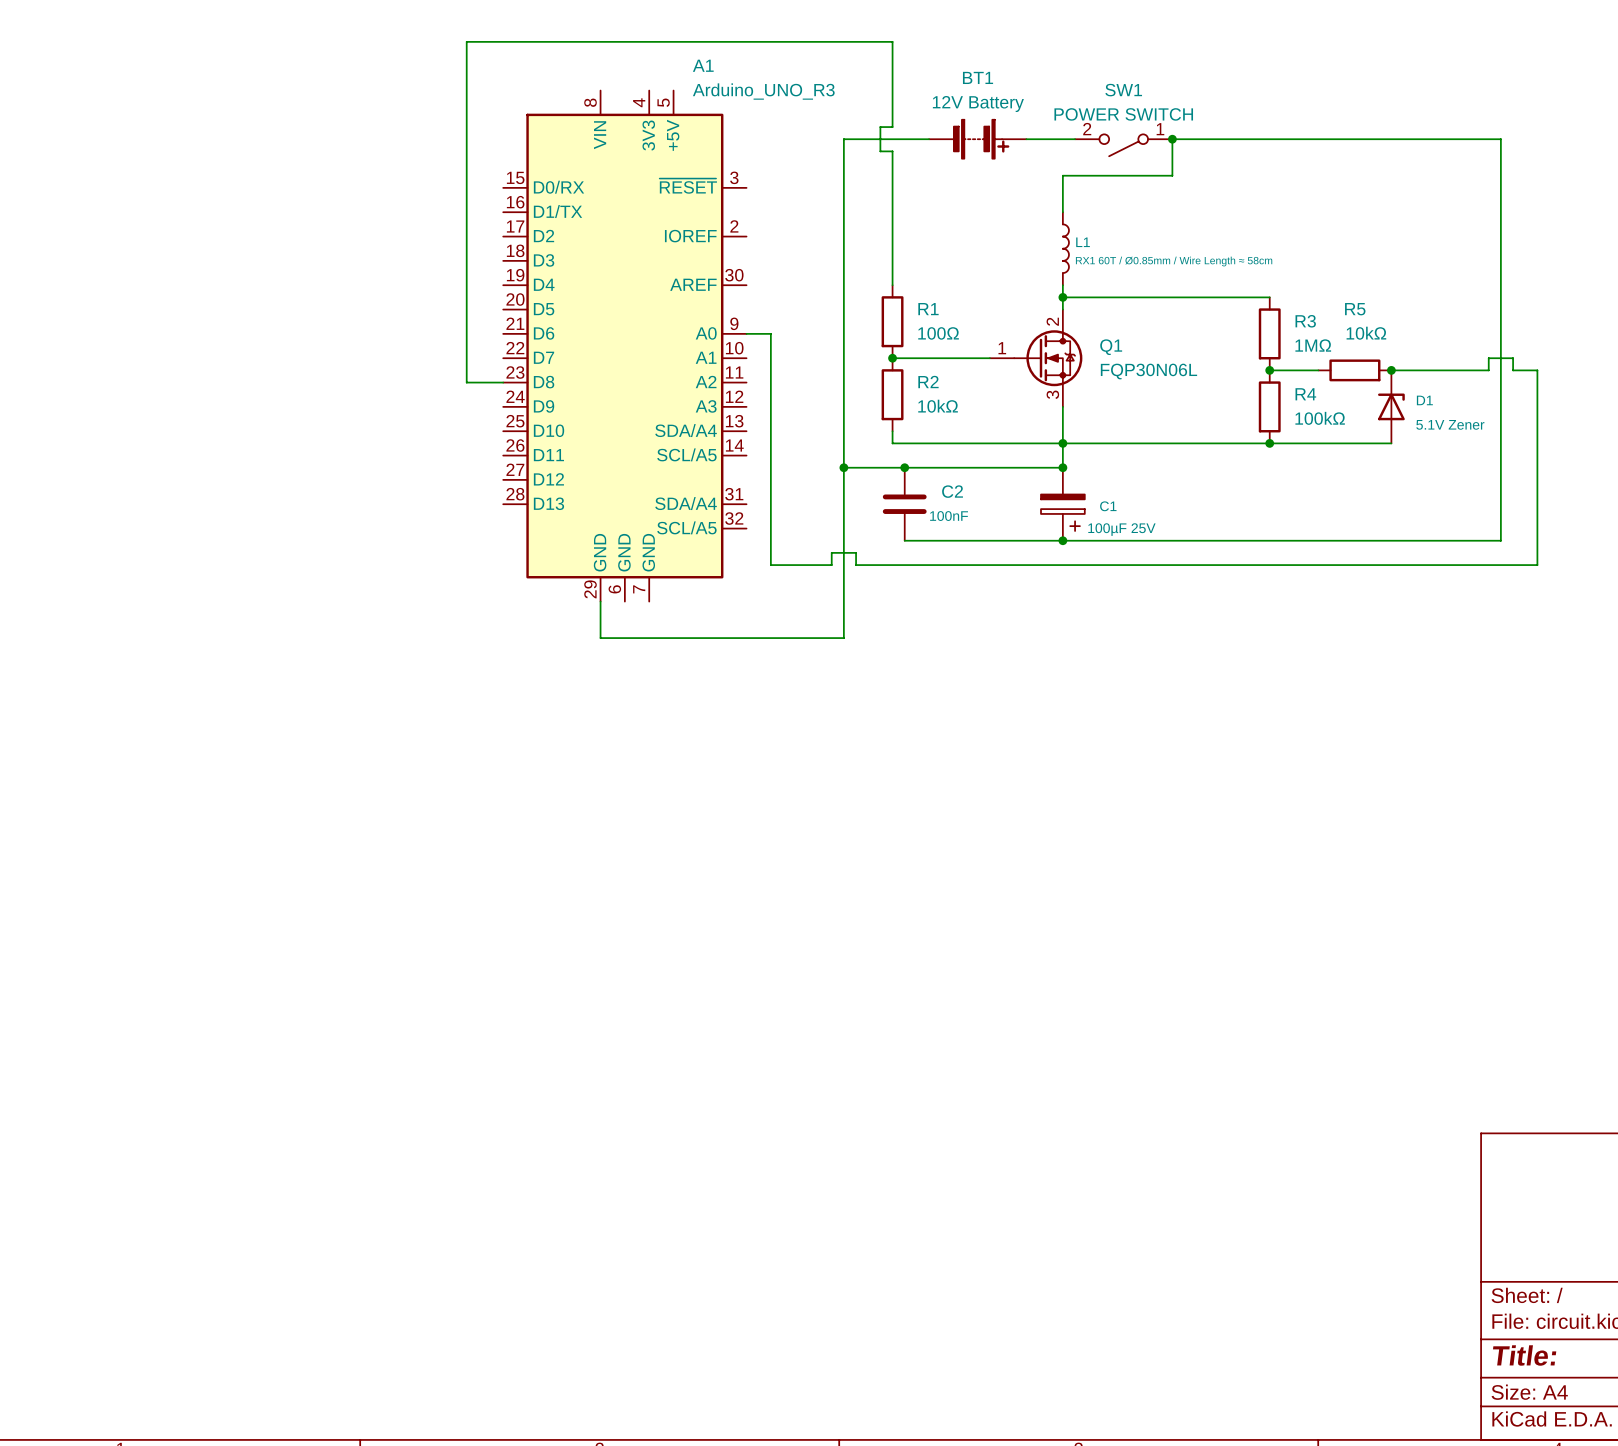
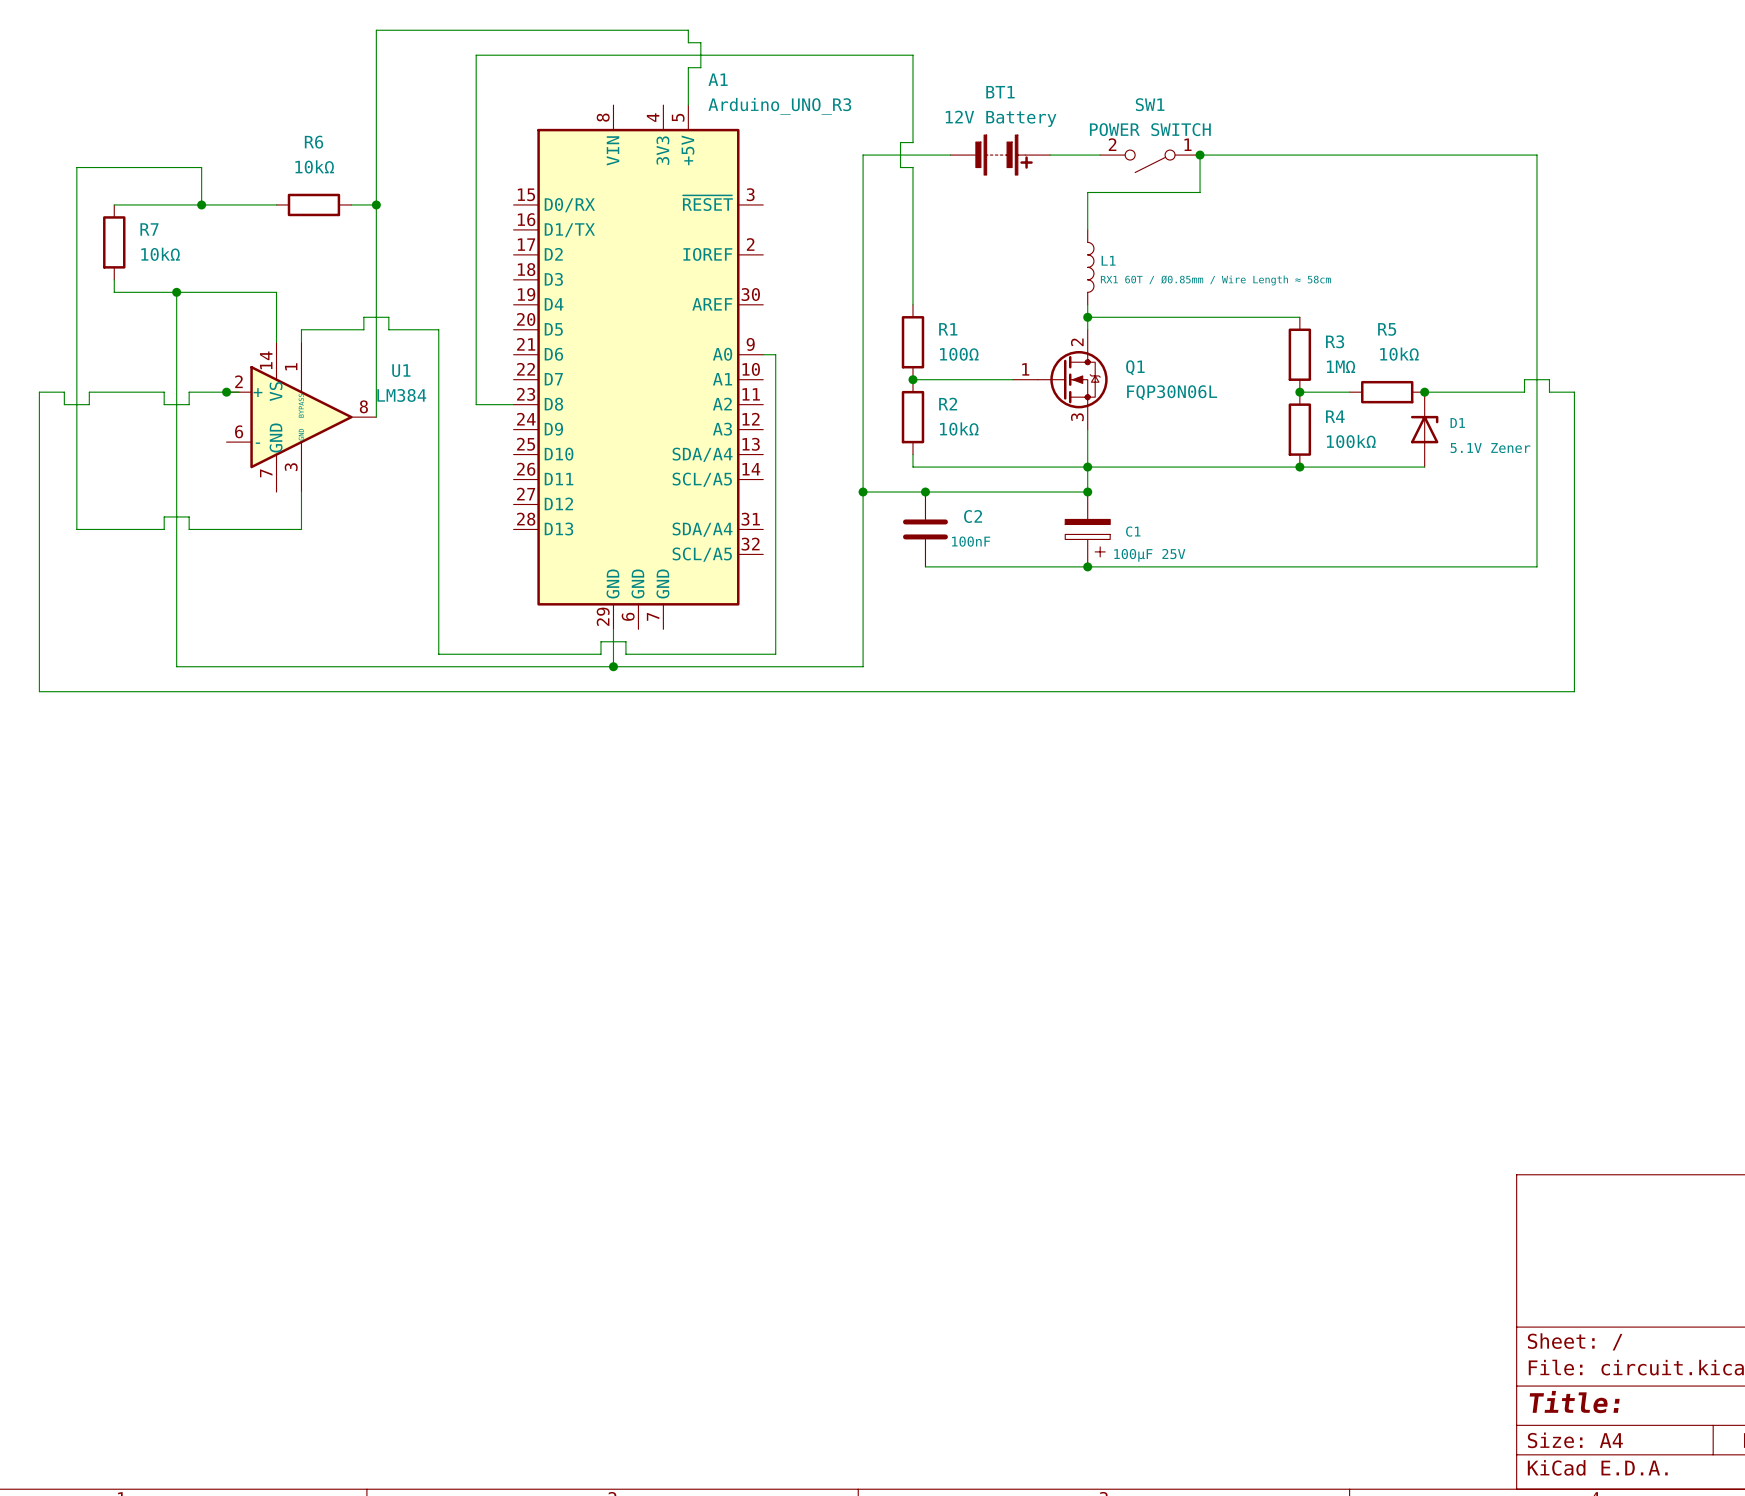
wire: none -> (688, 105) (688, 67) (700, 67) (700, 42) (688, 42) (688, 30) (376, 30) (376, 417)
wire: none -> (114, 204) (276, 204)
wire: none -> (201, 204) (201, 167) (76, 167) (76, 529) (164, 529) (164, 516) (189, 516) (189, 529) (301, 529) (301, 492)
junction: none -> (201, 204)
R6: none -> 10kΩ (313, 204)
wire: none -> (351, 204) (376, 204)
junction: none -> (376, 204)
R7: none -> 10kΩ (114, 242)
wire: none -> (114, 279) (114, 292) (276, 292) (276, 342)
wire: none -> (176, 292) (176, 666) (613, 666)
junction: none -> (176, 292)
wire: none -> (301, 342) (301, 329) (363, 329) (363, 317) (388, 317) (388, 329) (438, 329) (438, 654) (600, 654) (600, 641) (625, 641) (625, 654) (775, 654) (775, 354)
wire: (758, 333) (770, 333) (770, 565) (831, 565) (831, 552) (856, 552) (856, 565) (1537, 565) -> (239, 392) (189, 392) (189, 404) (164, 404) (164, 392) (89, 392) (89, 404) (64, 404) (64, 392) (39, 392) (39, 691) (1574, 691) (1574, 591)
junction: none -> (226, 392)
U1: none -> LM384 (301, 417)
junction: none -> (613, 666)

